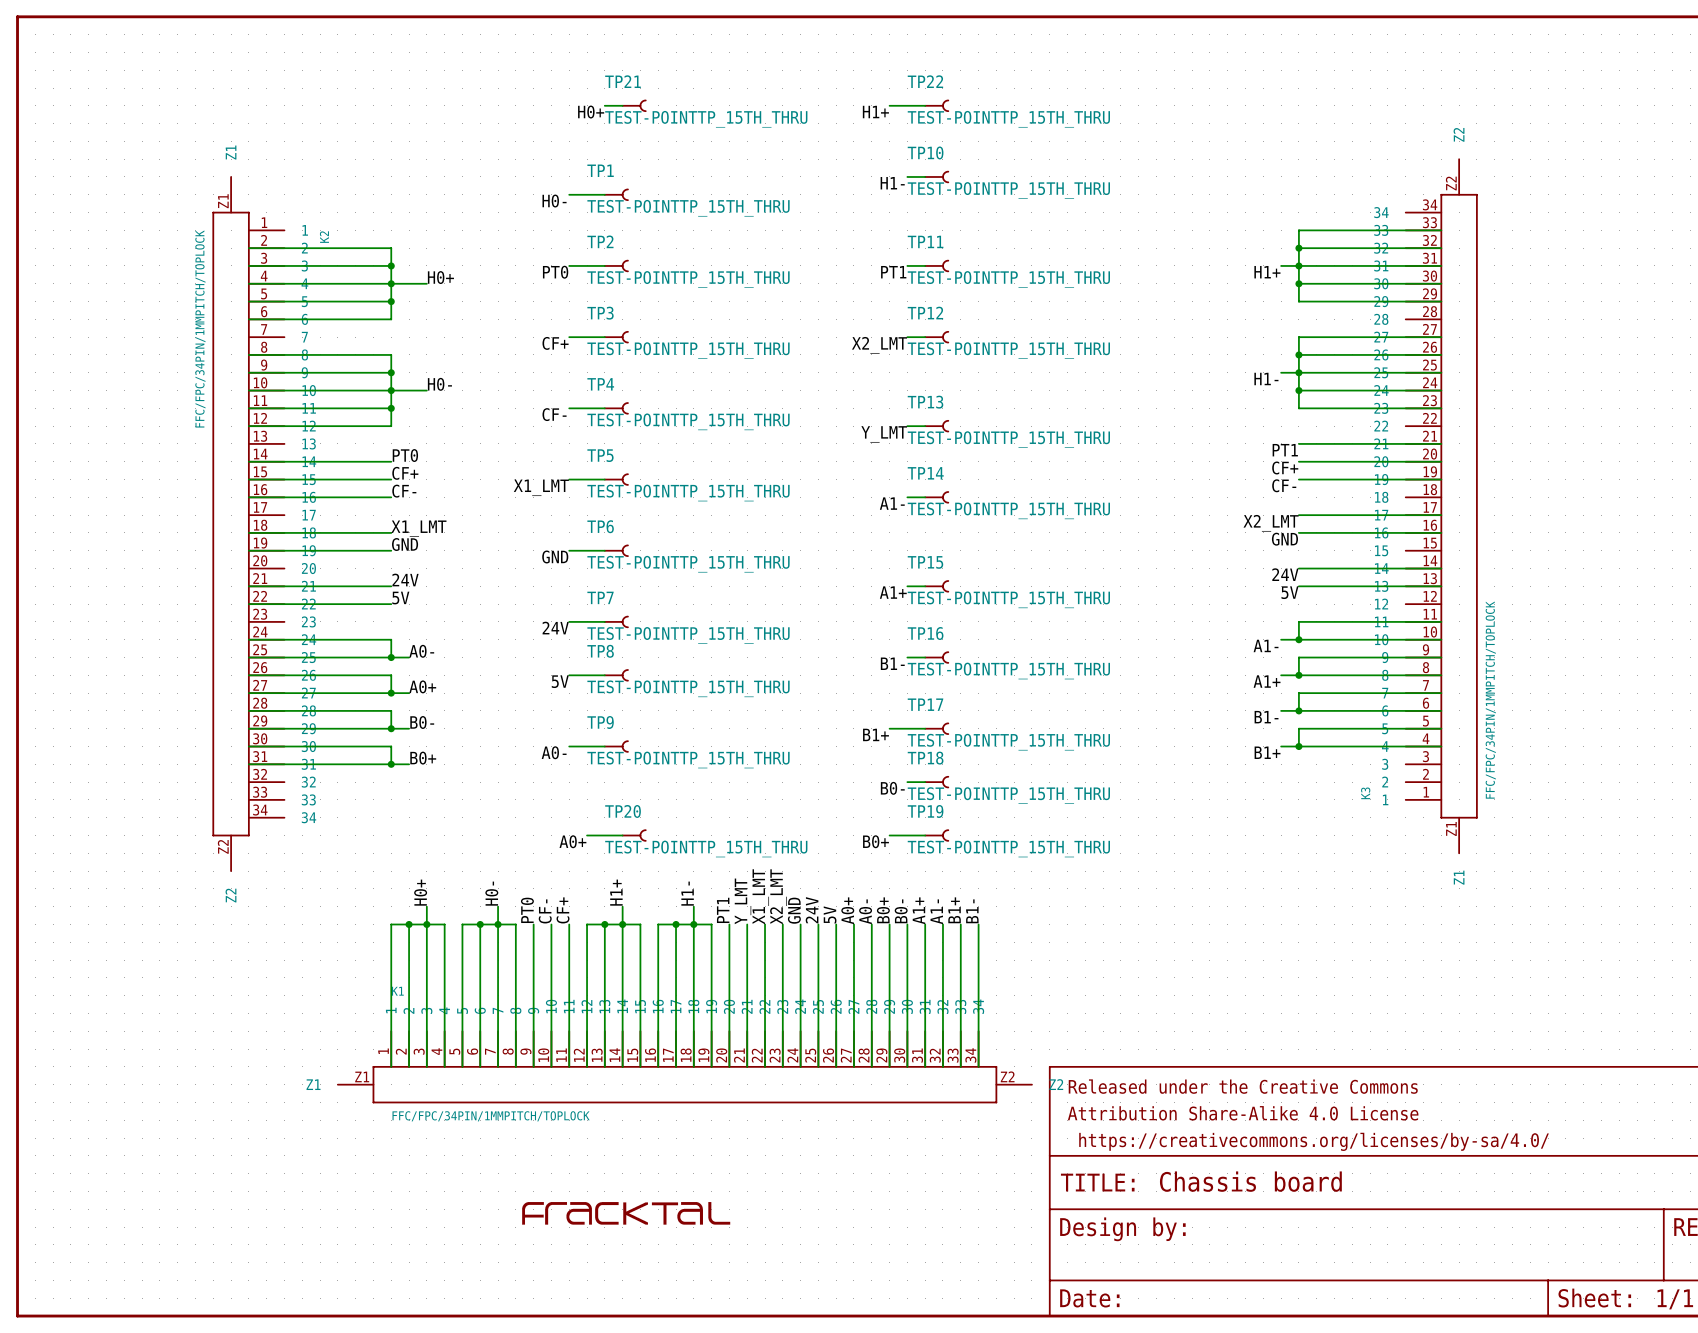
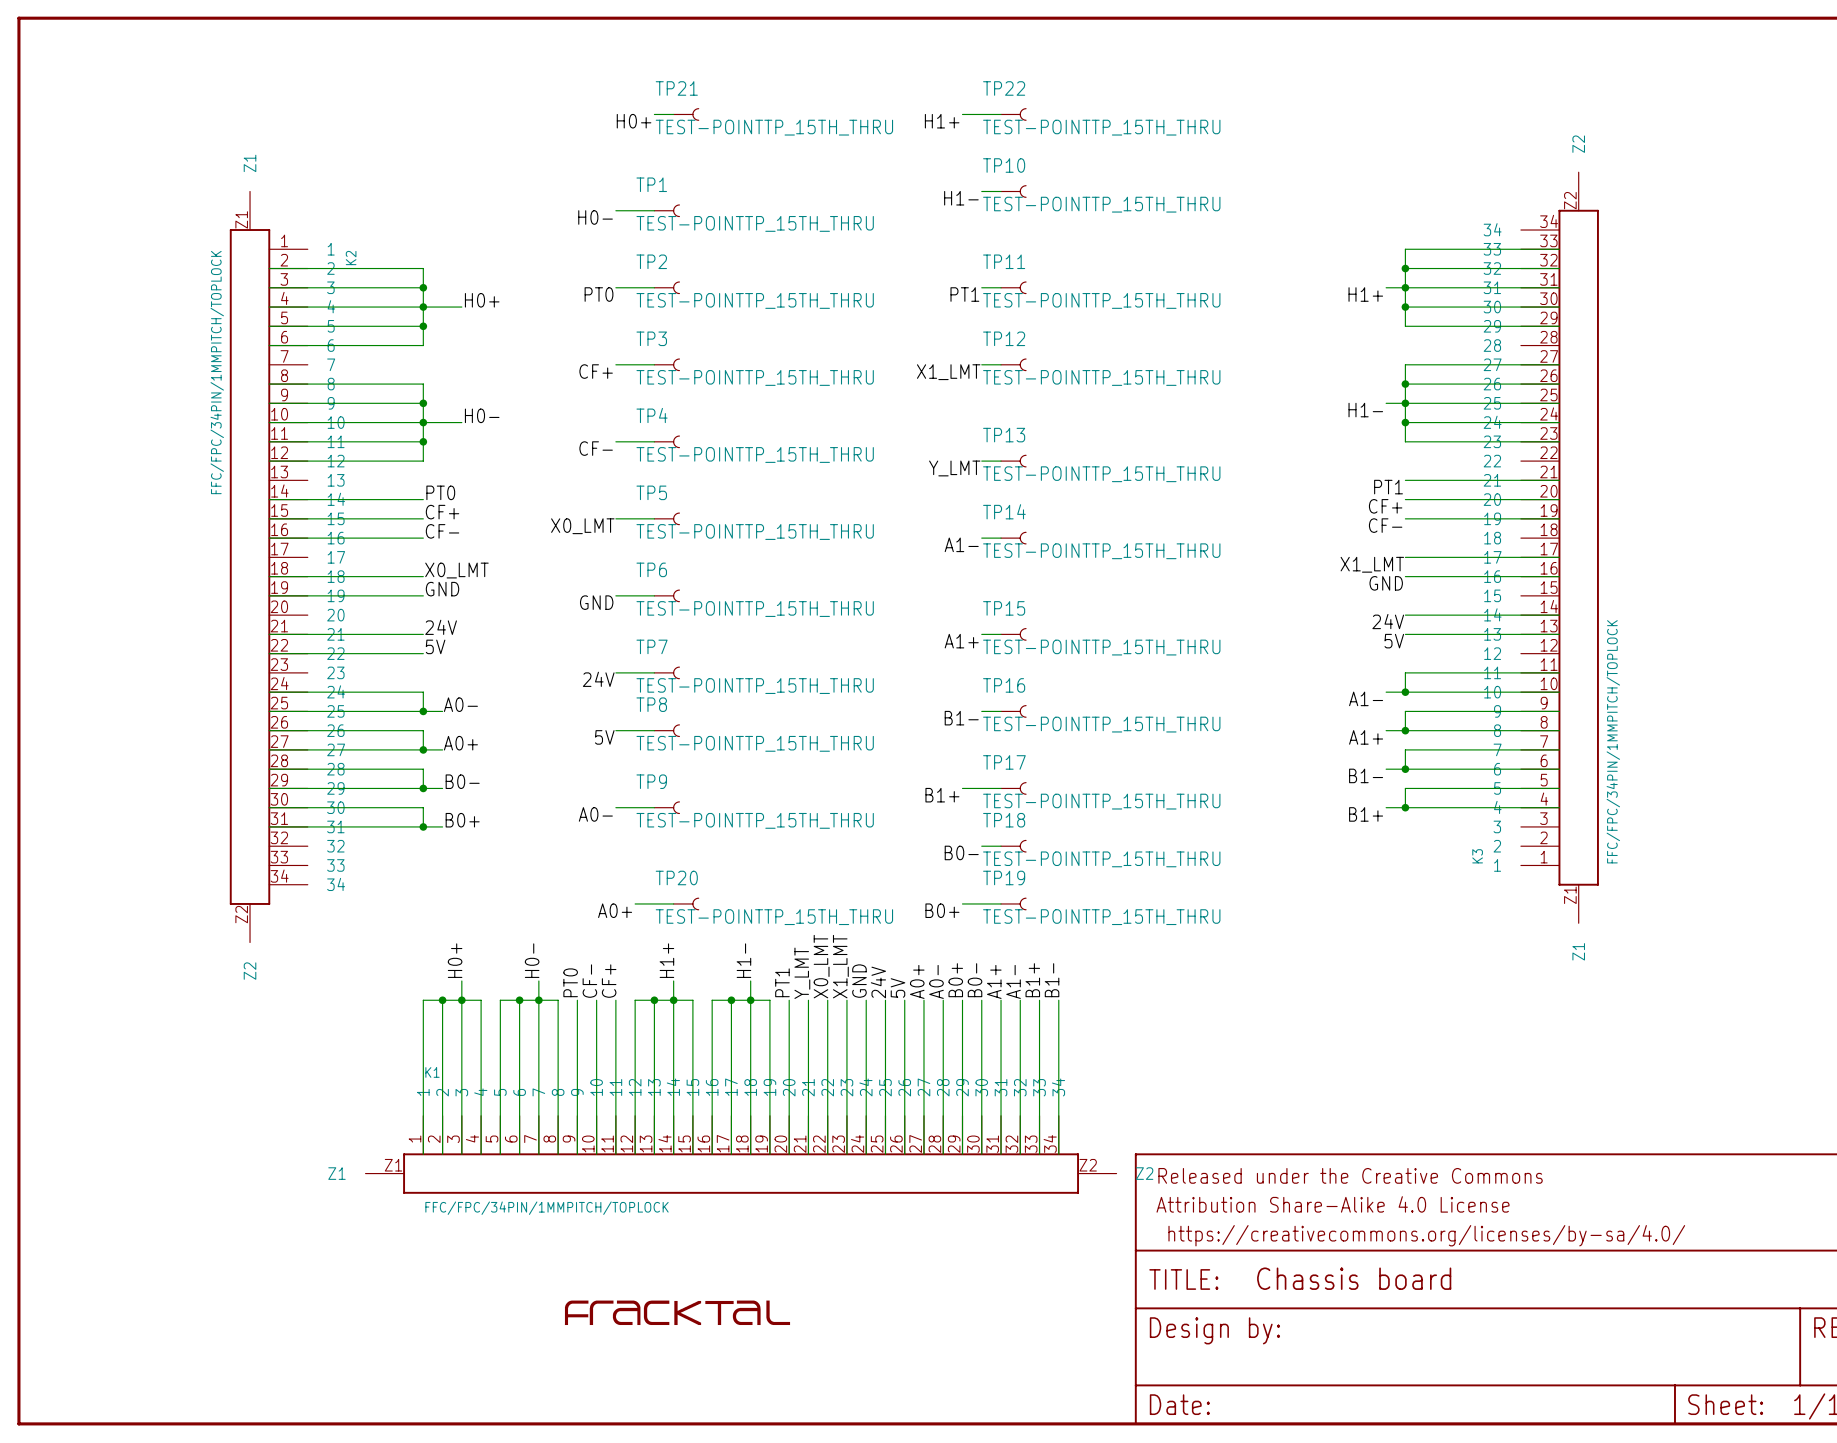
label: X2_LMT (879, 345) -> X1_LMT (948, 372)
label: X1_LMT (541, 487) -> X0_LMT (582, 526)
label: X2_LMT (1271, 523) -> X1_LMT (1372, 564)
label: X1_LMT (418, 528) -> X0_LMT (456, 570)
label: X1_LMT (760, 896) -> X0_LMT (821, 966)
label: X2_LMT (778, 896) -> X1_LMT (840, 966)

